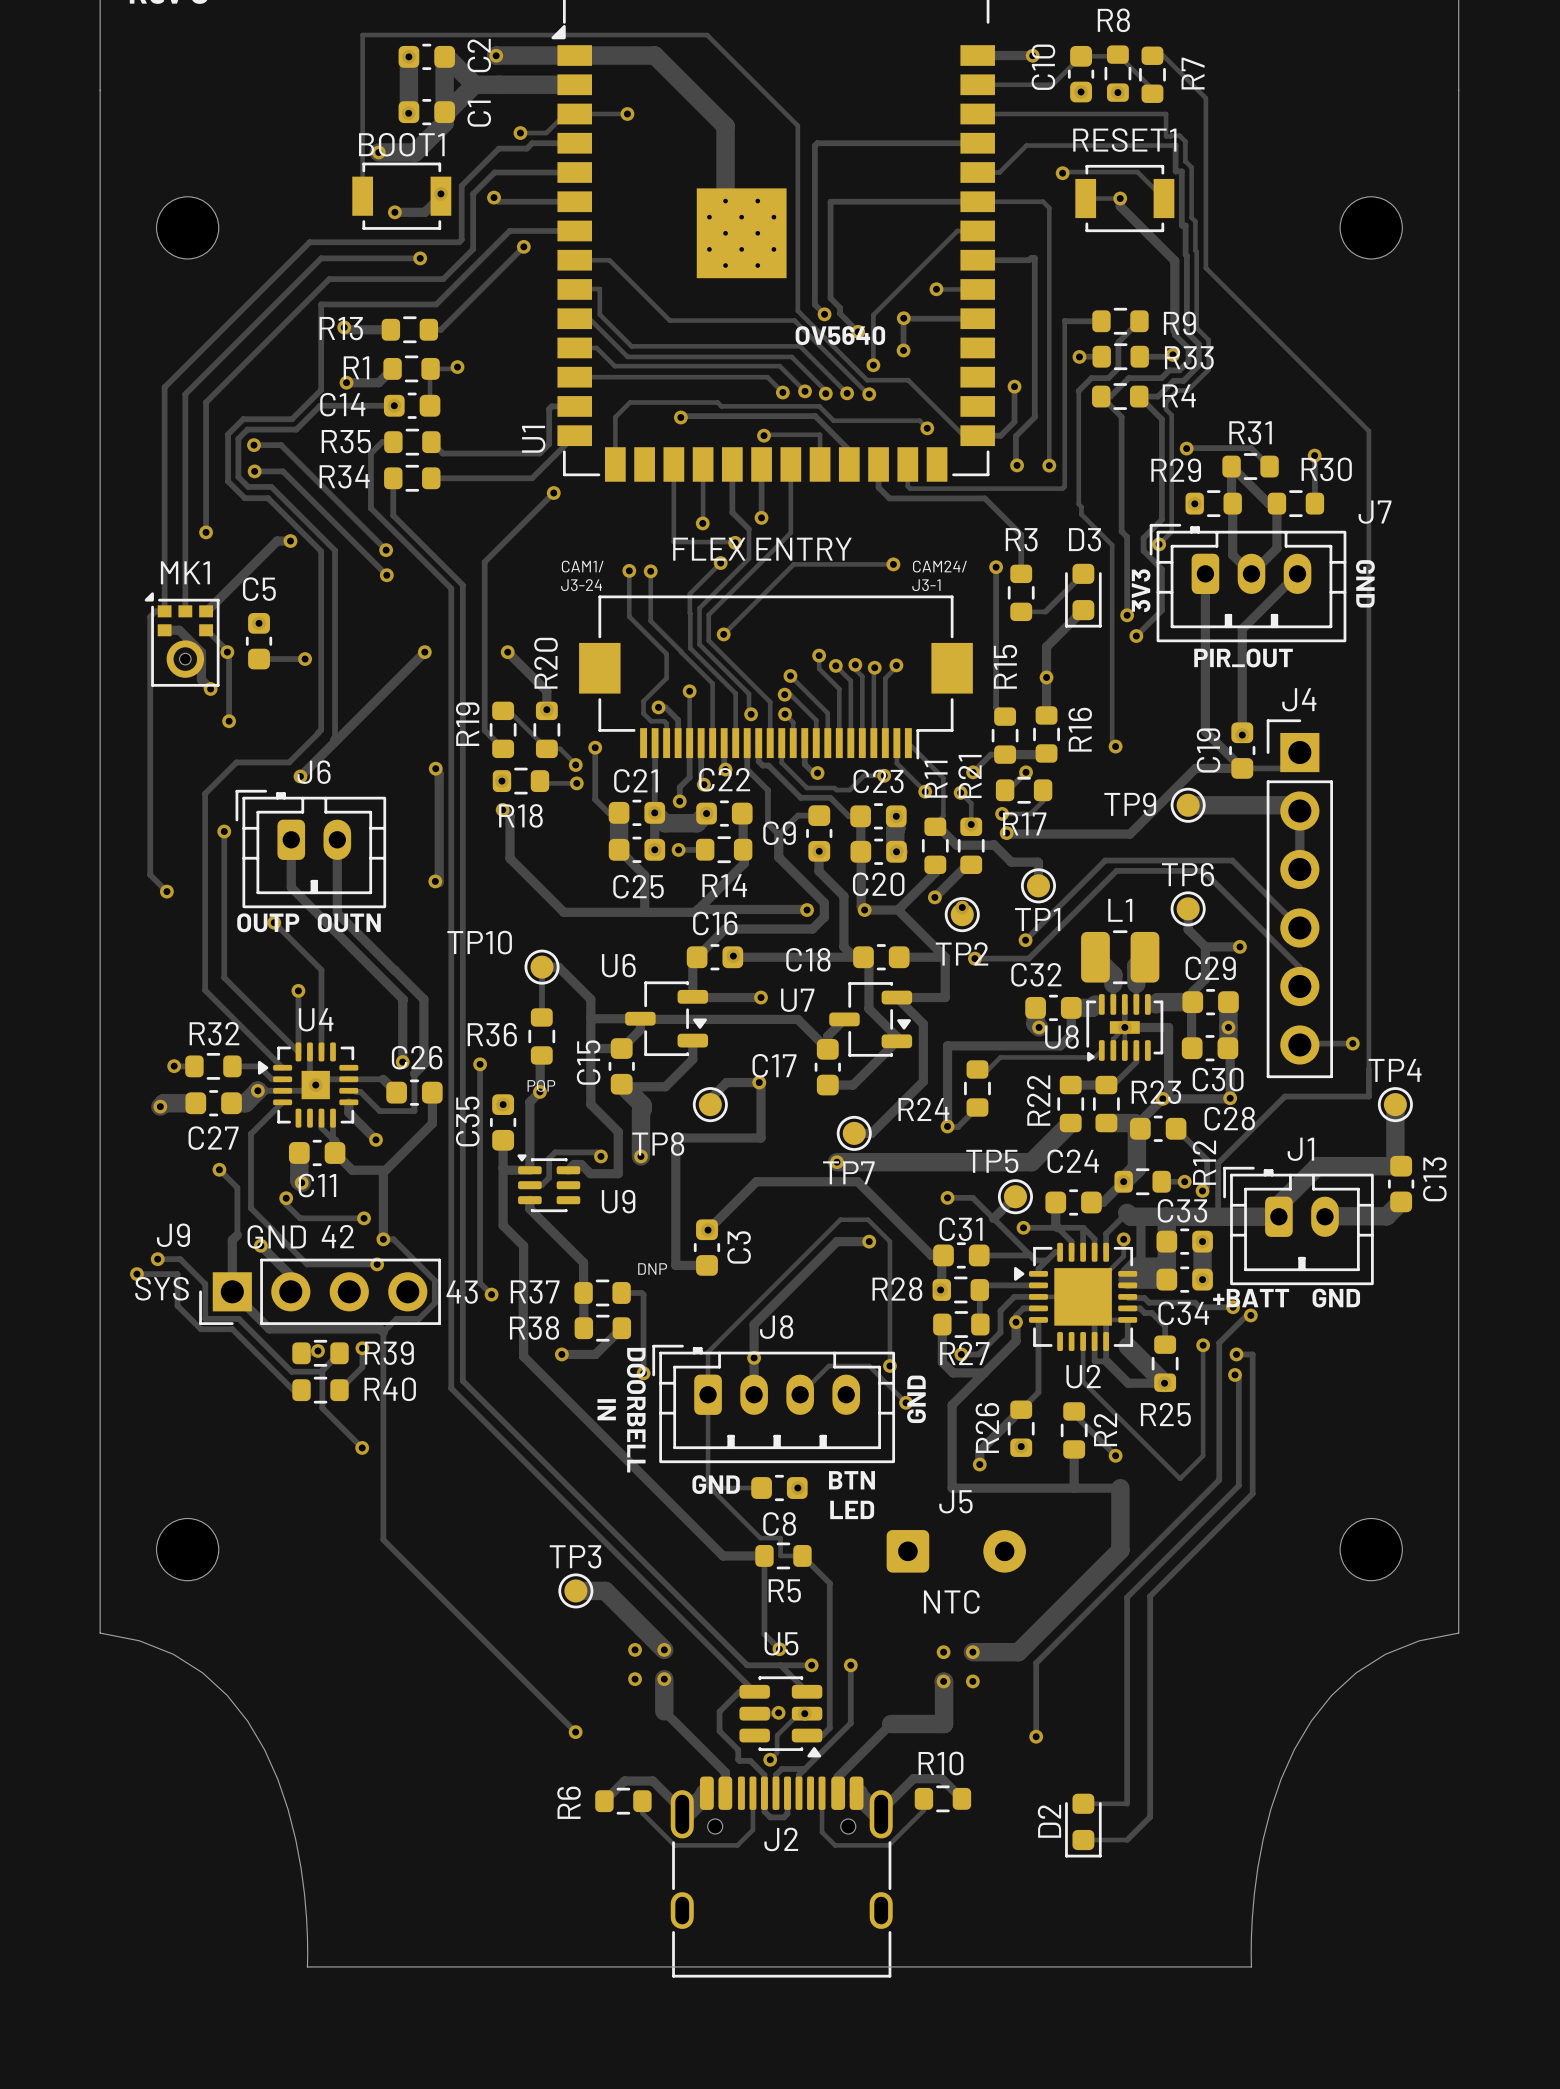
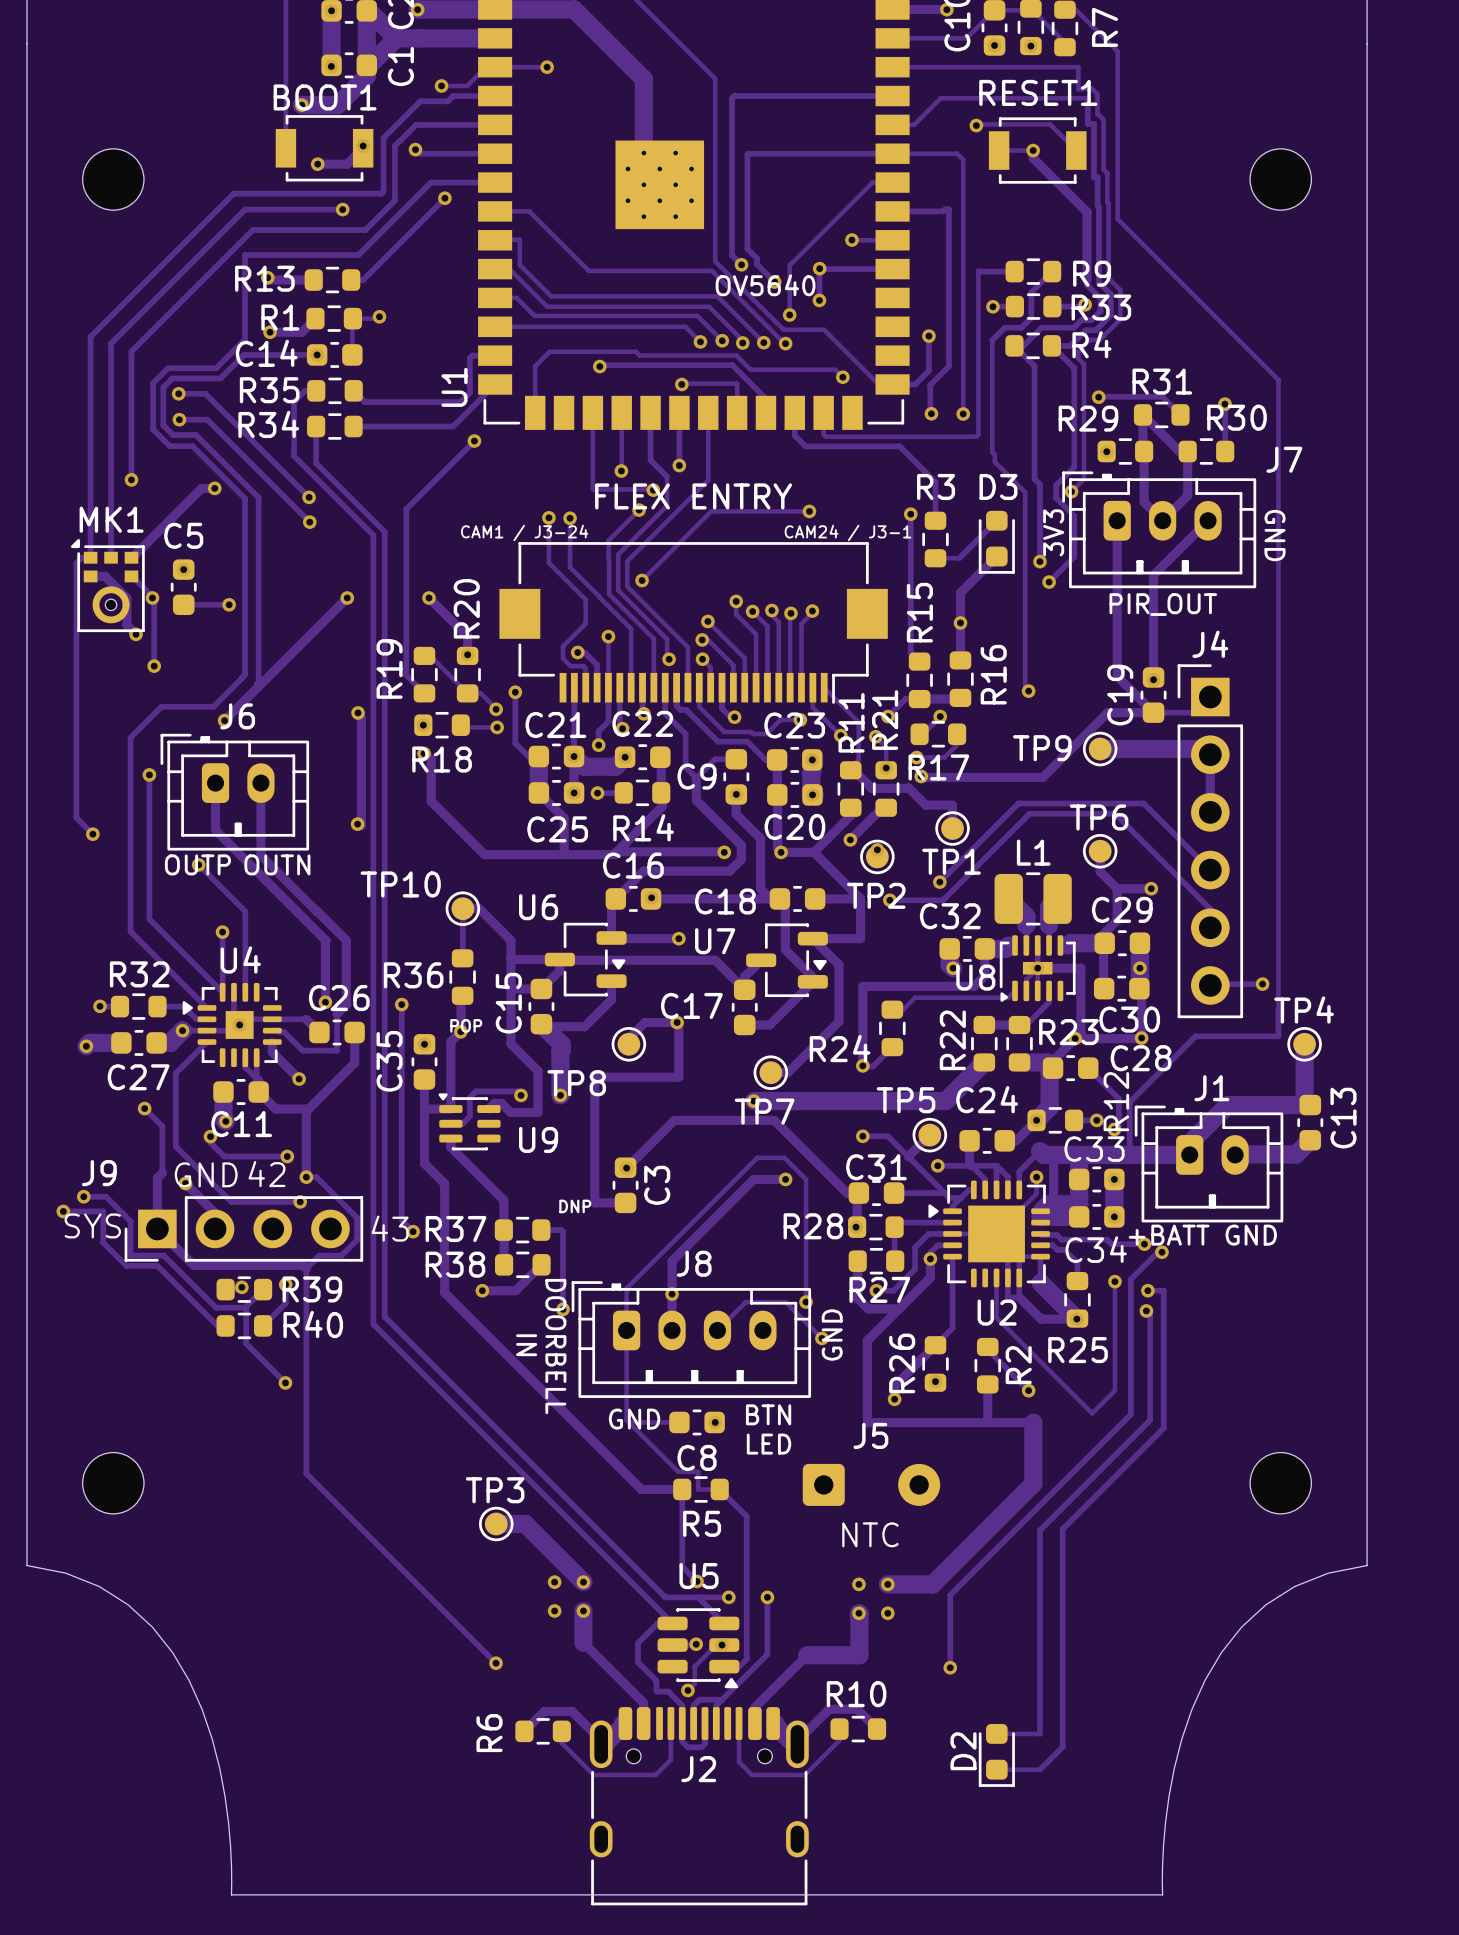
text: CAM1/ (582, 566) -> none
text: CAM24/ (939, 566) -> CAM24 / J3-1 (848, 532)
text: J3-24 (581, 585) -> none
text: none -> CAM1 / J3-24 (524, 532)
text: J3-1 (926, 585) -> none

